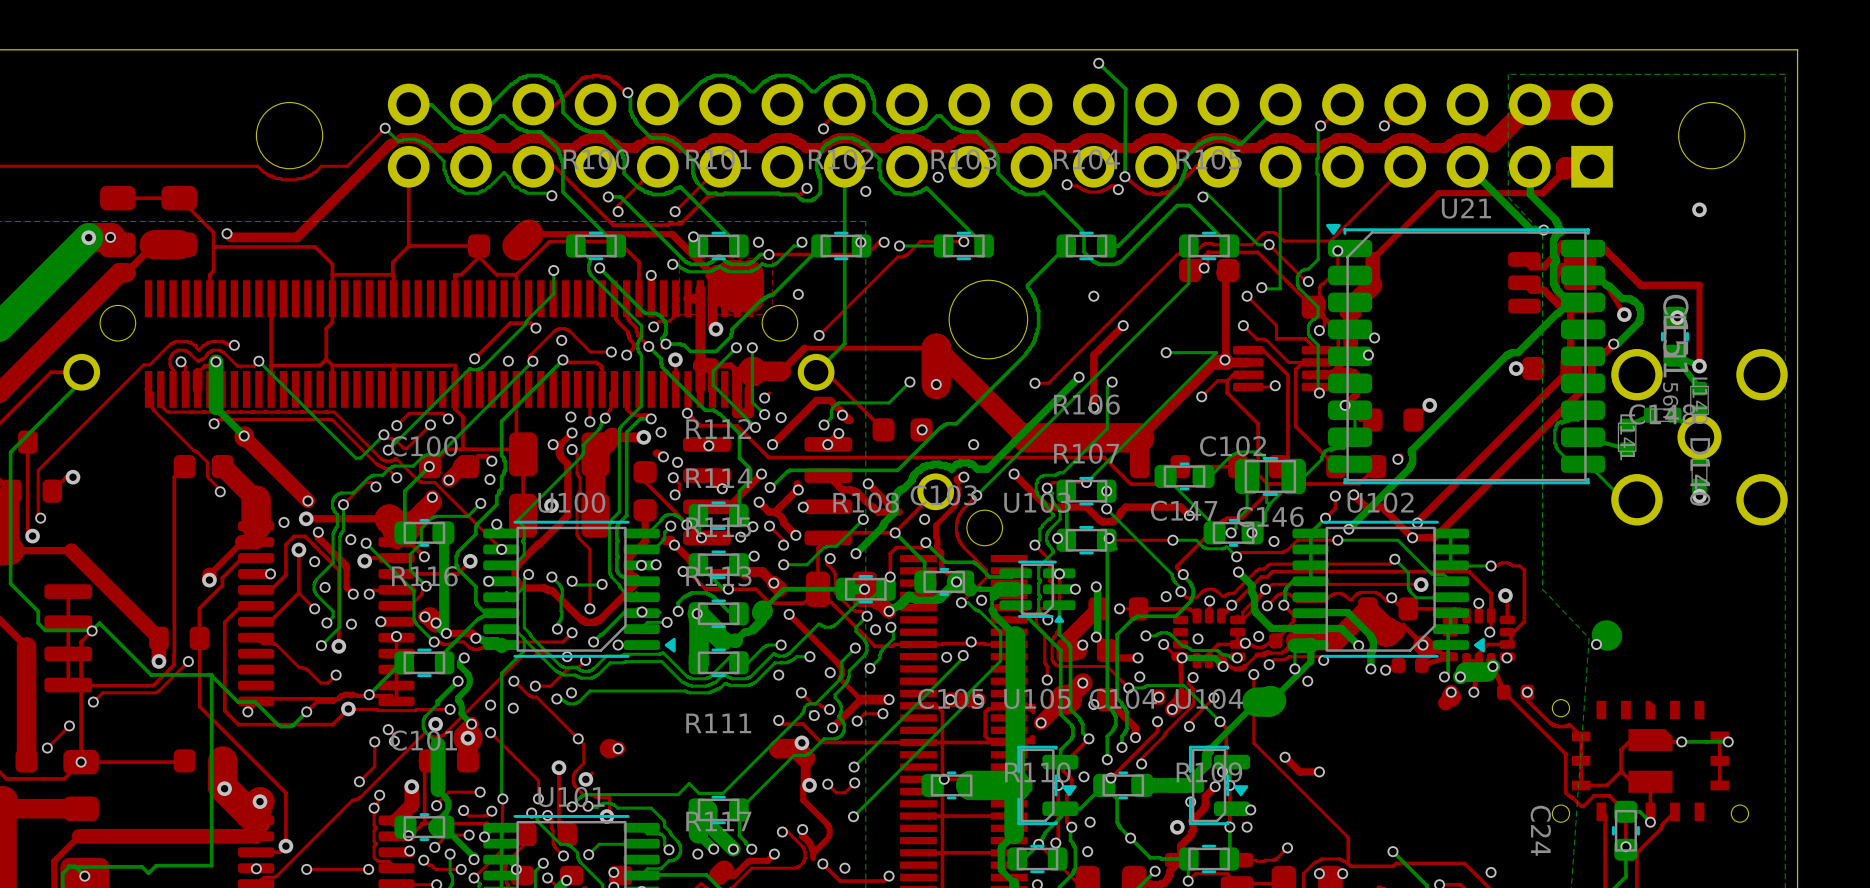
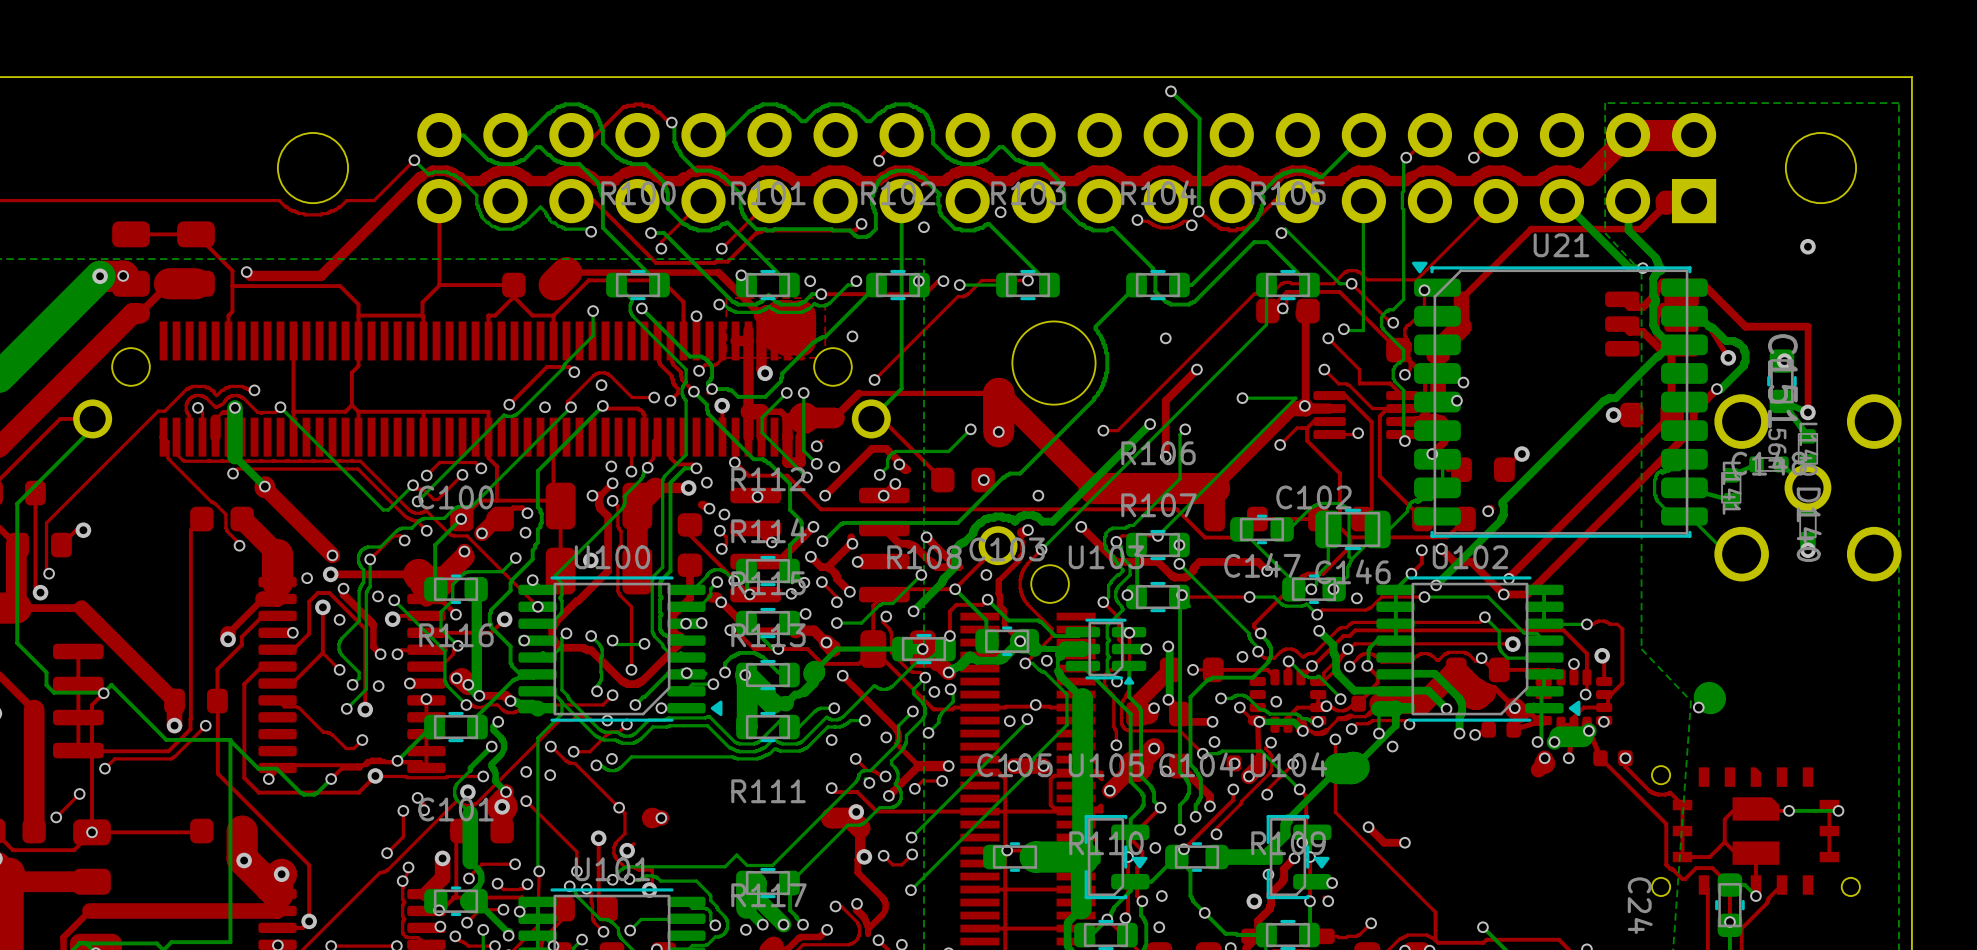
via: (325, 587) -> none
bottom track: none -> (1288, 661) (1304, 676) (1319, 676) (1340, 699)

